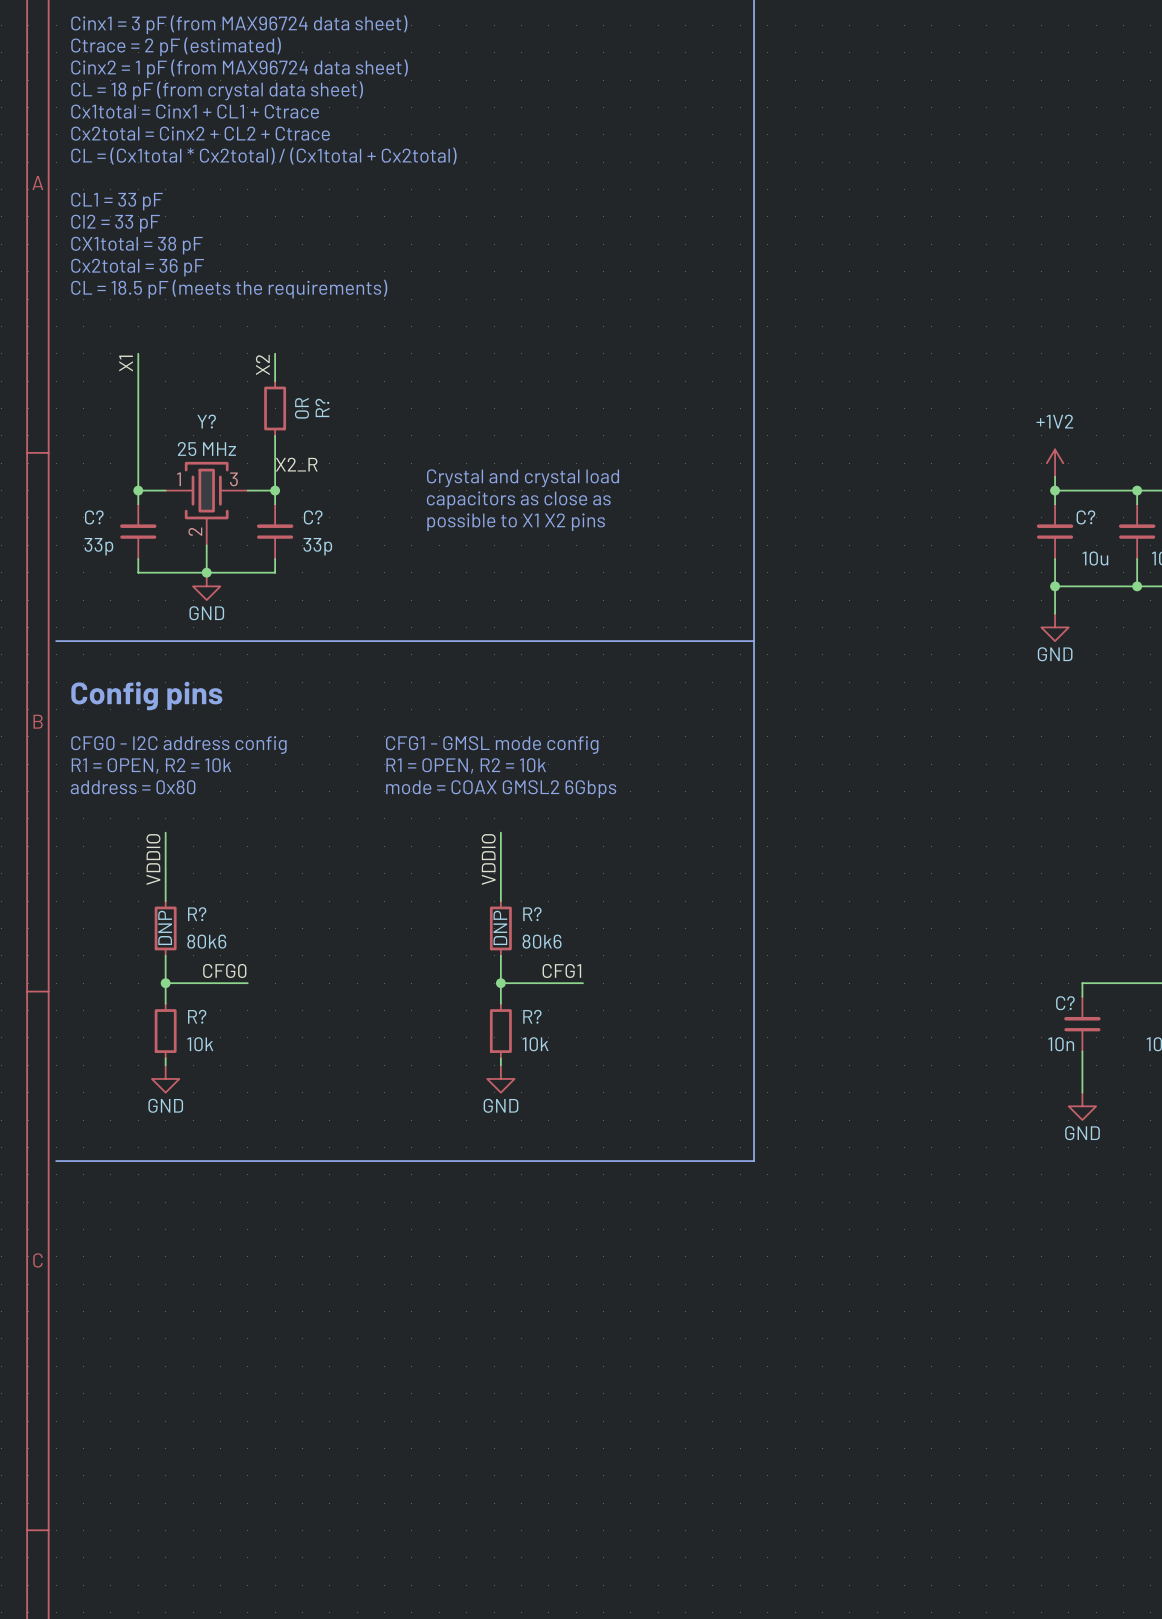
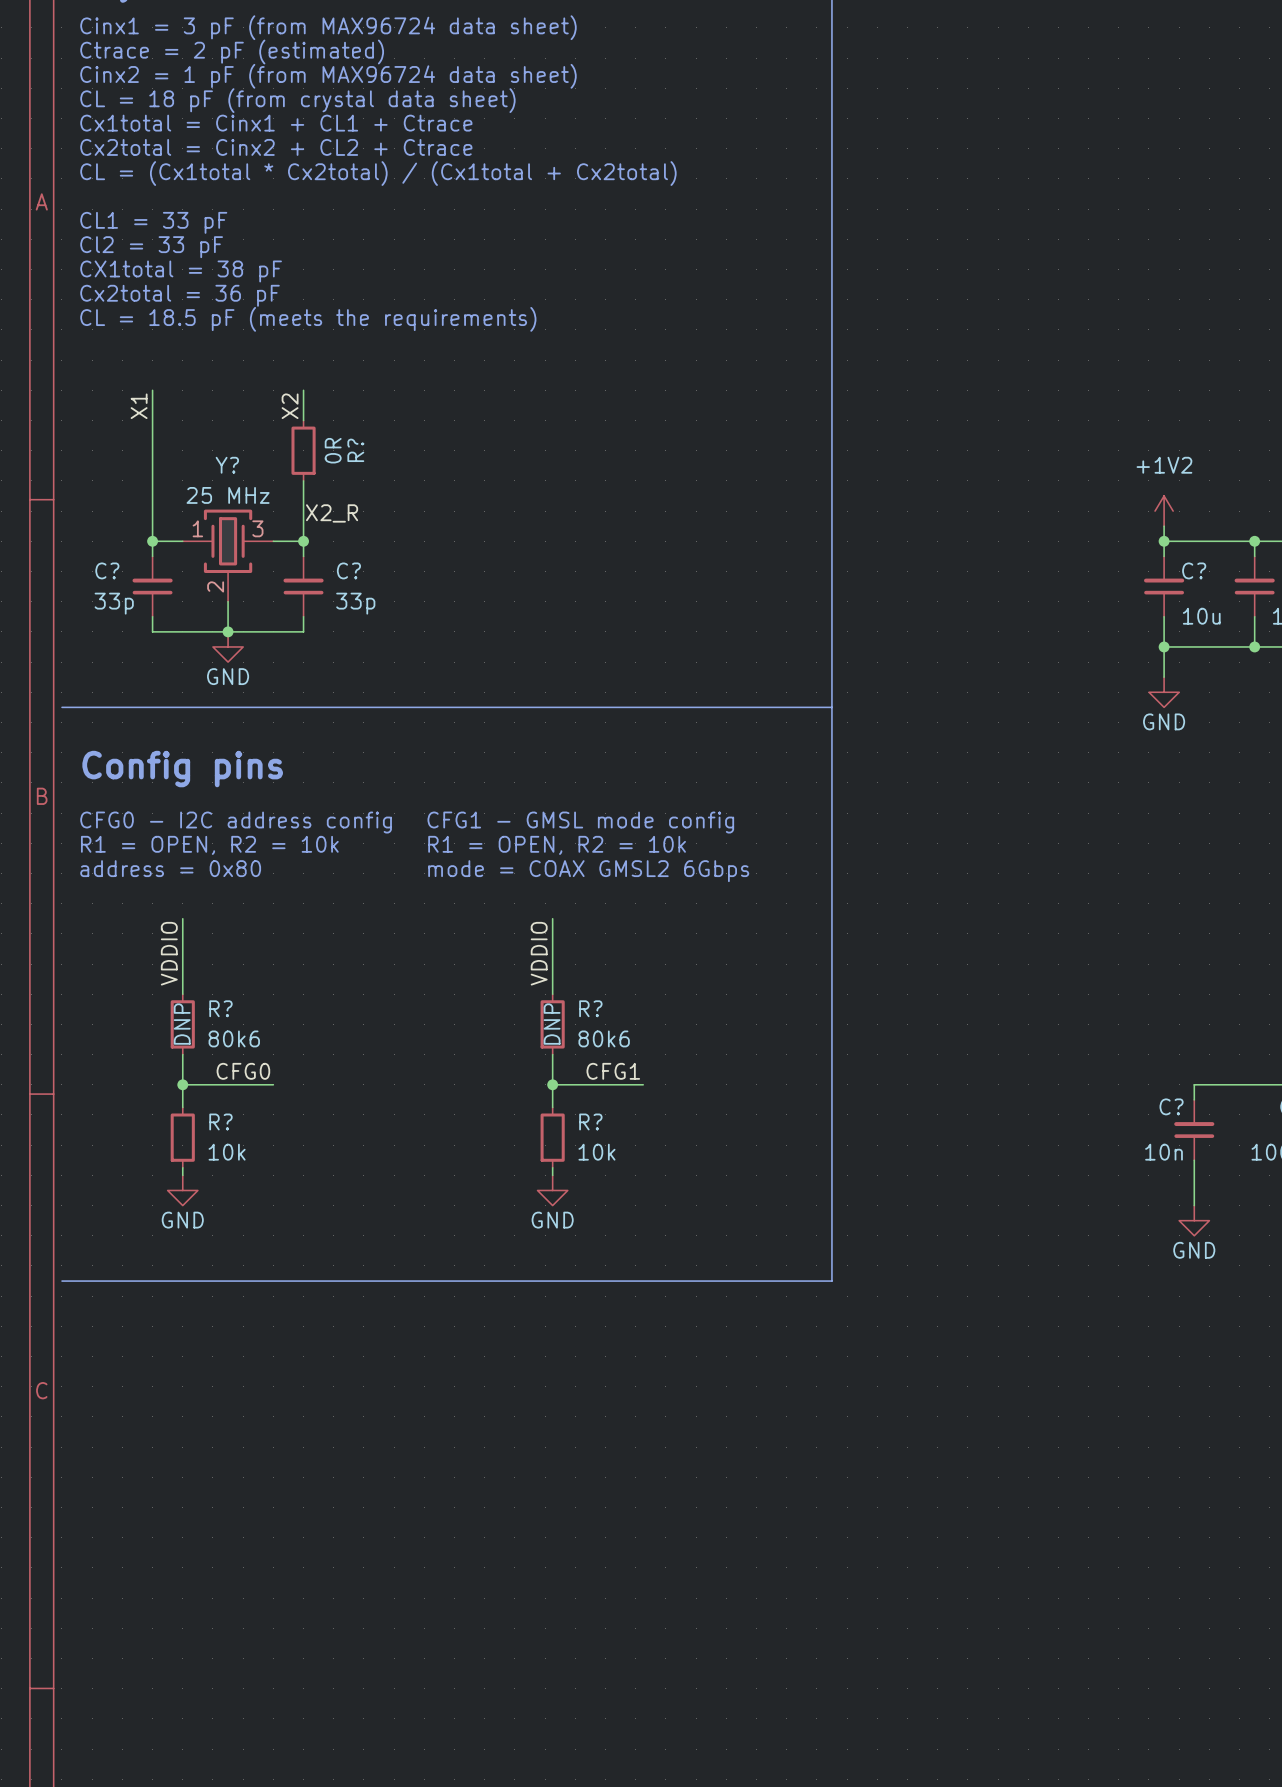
text: Crystal and crystal load (523, 478) -> none
text: capacitors as close as (518, 500) -> none
text: possible to X1 X2 pins (516, 522) -> none

